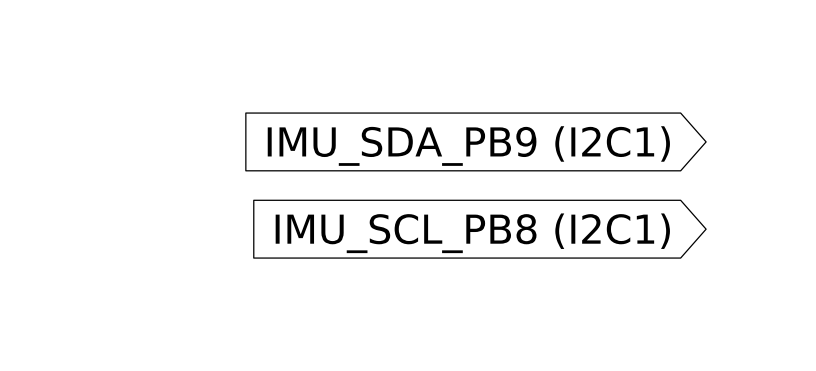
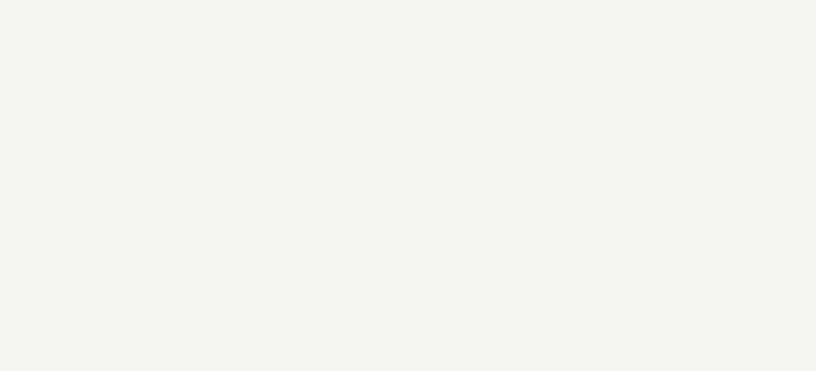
global label: IMU_SDA_PB9 (I2C1) (468, 146) -> none
global label: IMU_SCL_PB8 (I2C1) (472, 233) -> none

